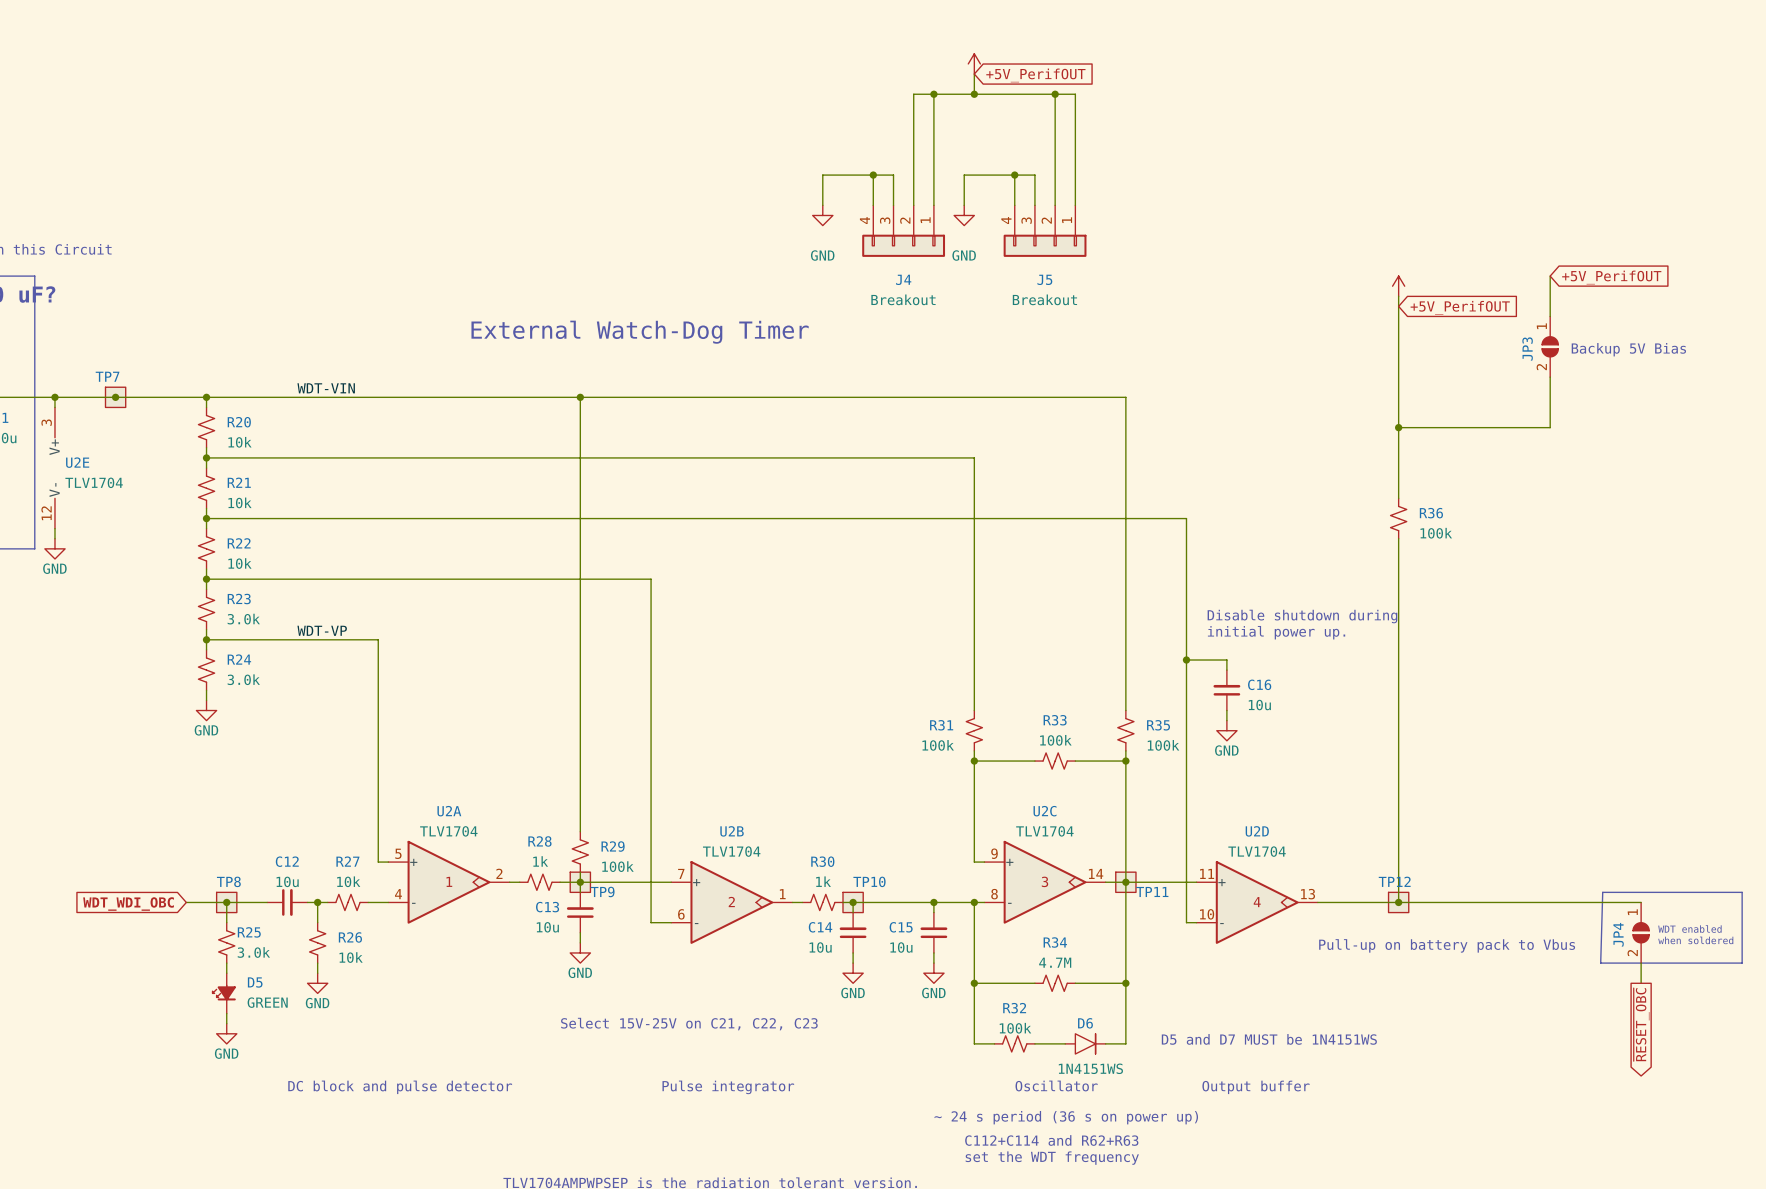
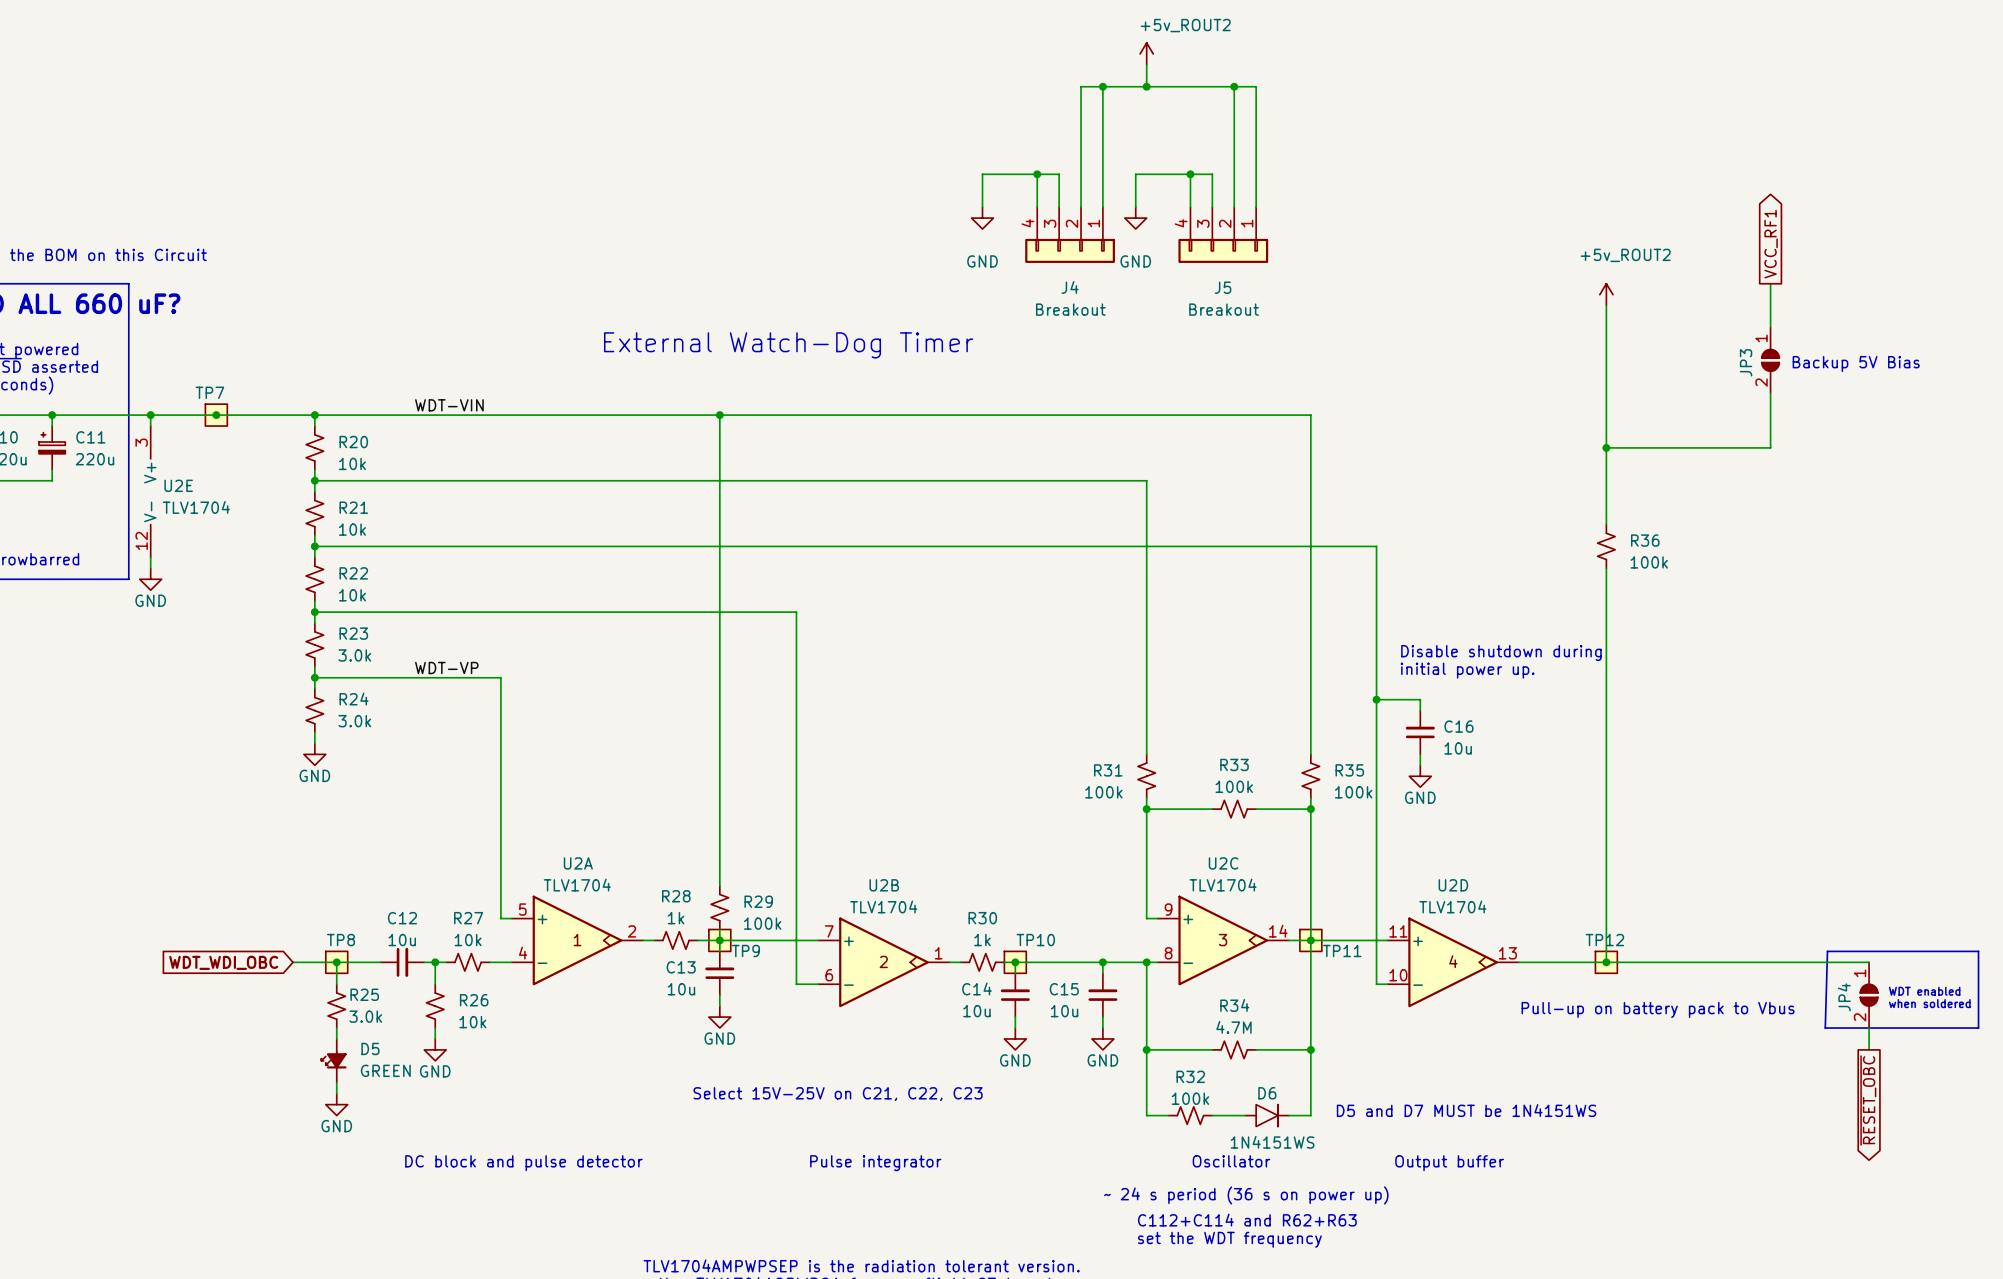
power symbol text: none -> +5v_ROUT2 (1185, 25)
global label: +5V_PerifOUT (1035, 75) -> none
power symbol text: none -> +5v_ROUT2 (1625, 255)
global label shape: input (1611, 277) -> output (1771, 244)
global label: +5V_PerifOUT (1611, 277) -> VCC_RF1 (1771, 244)
global label: +5V_PerifOUT (1460, 307) -> none

